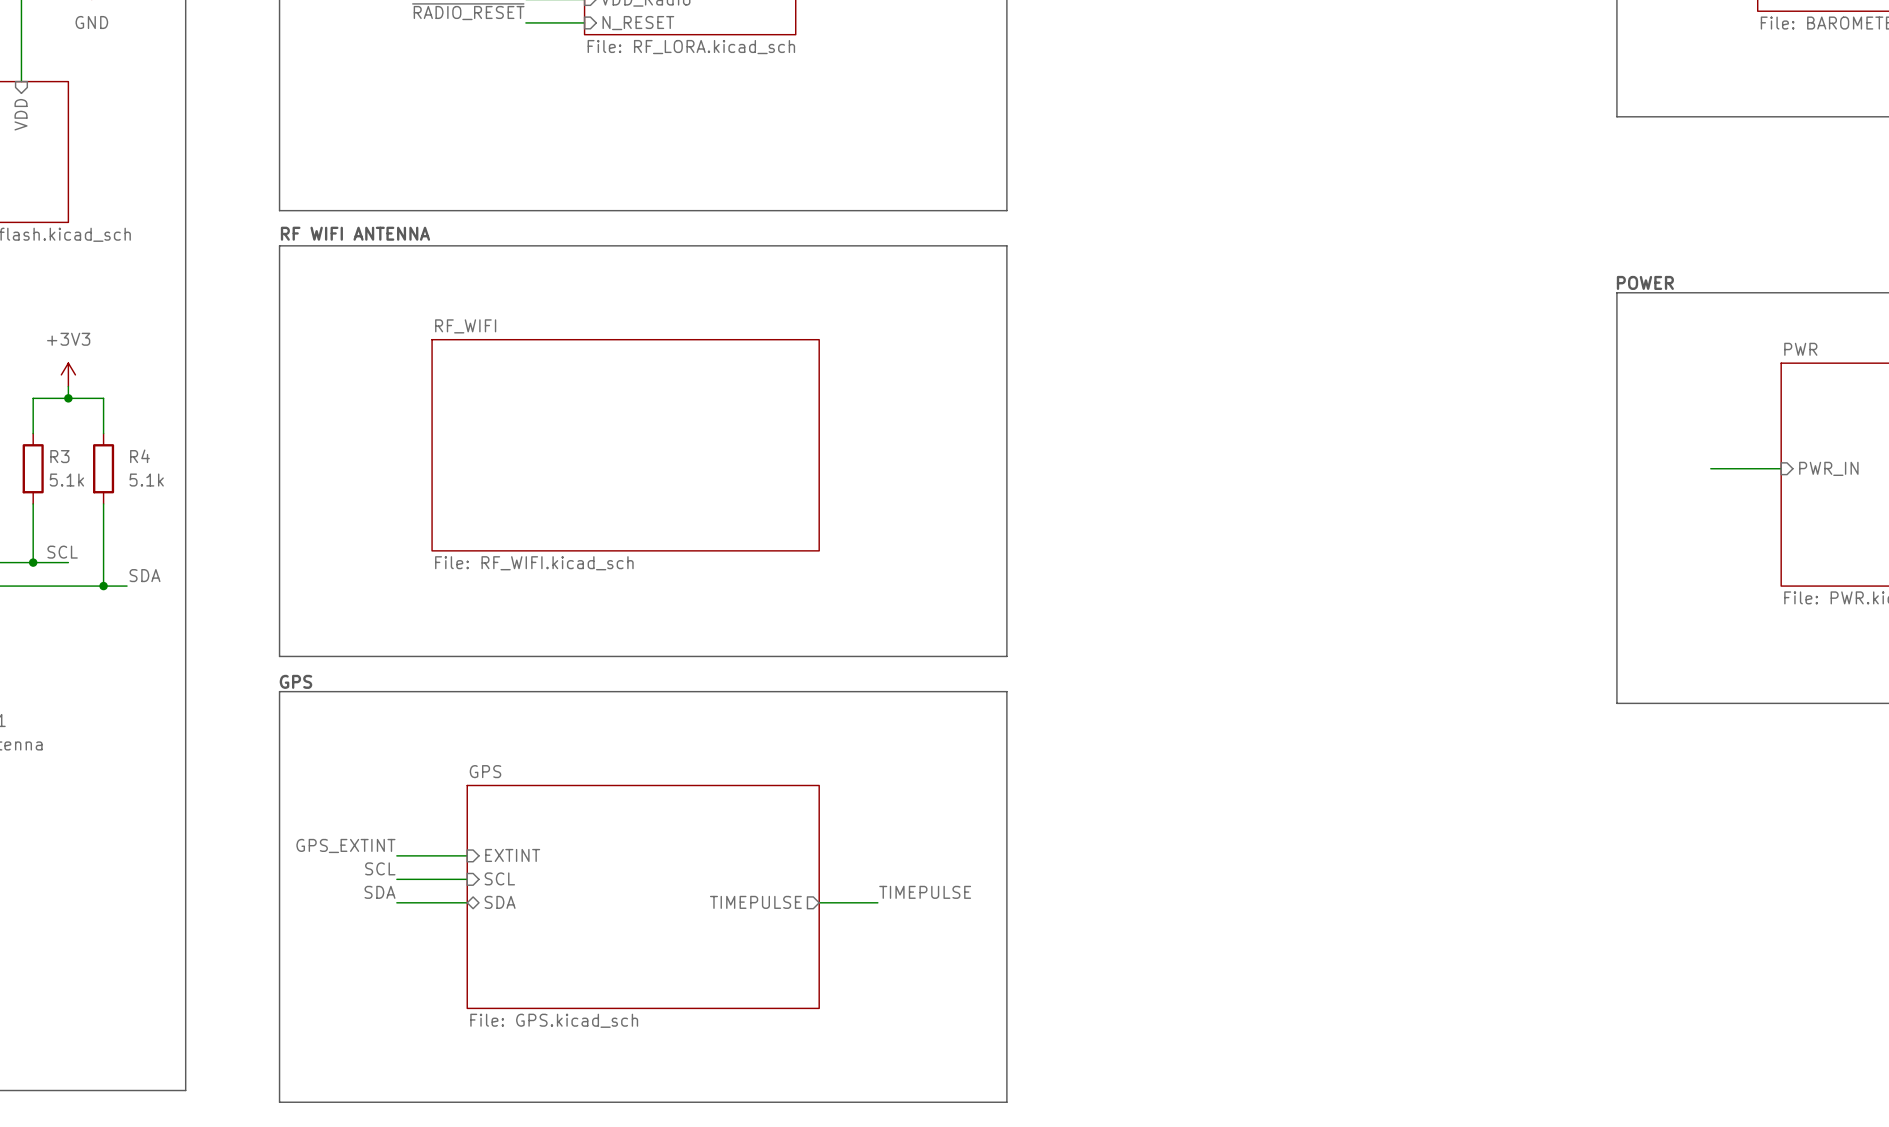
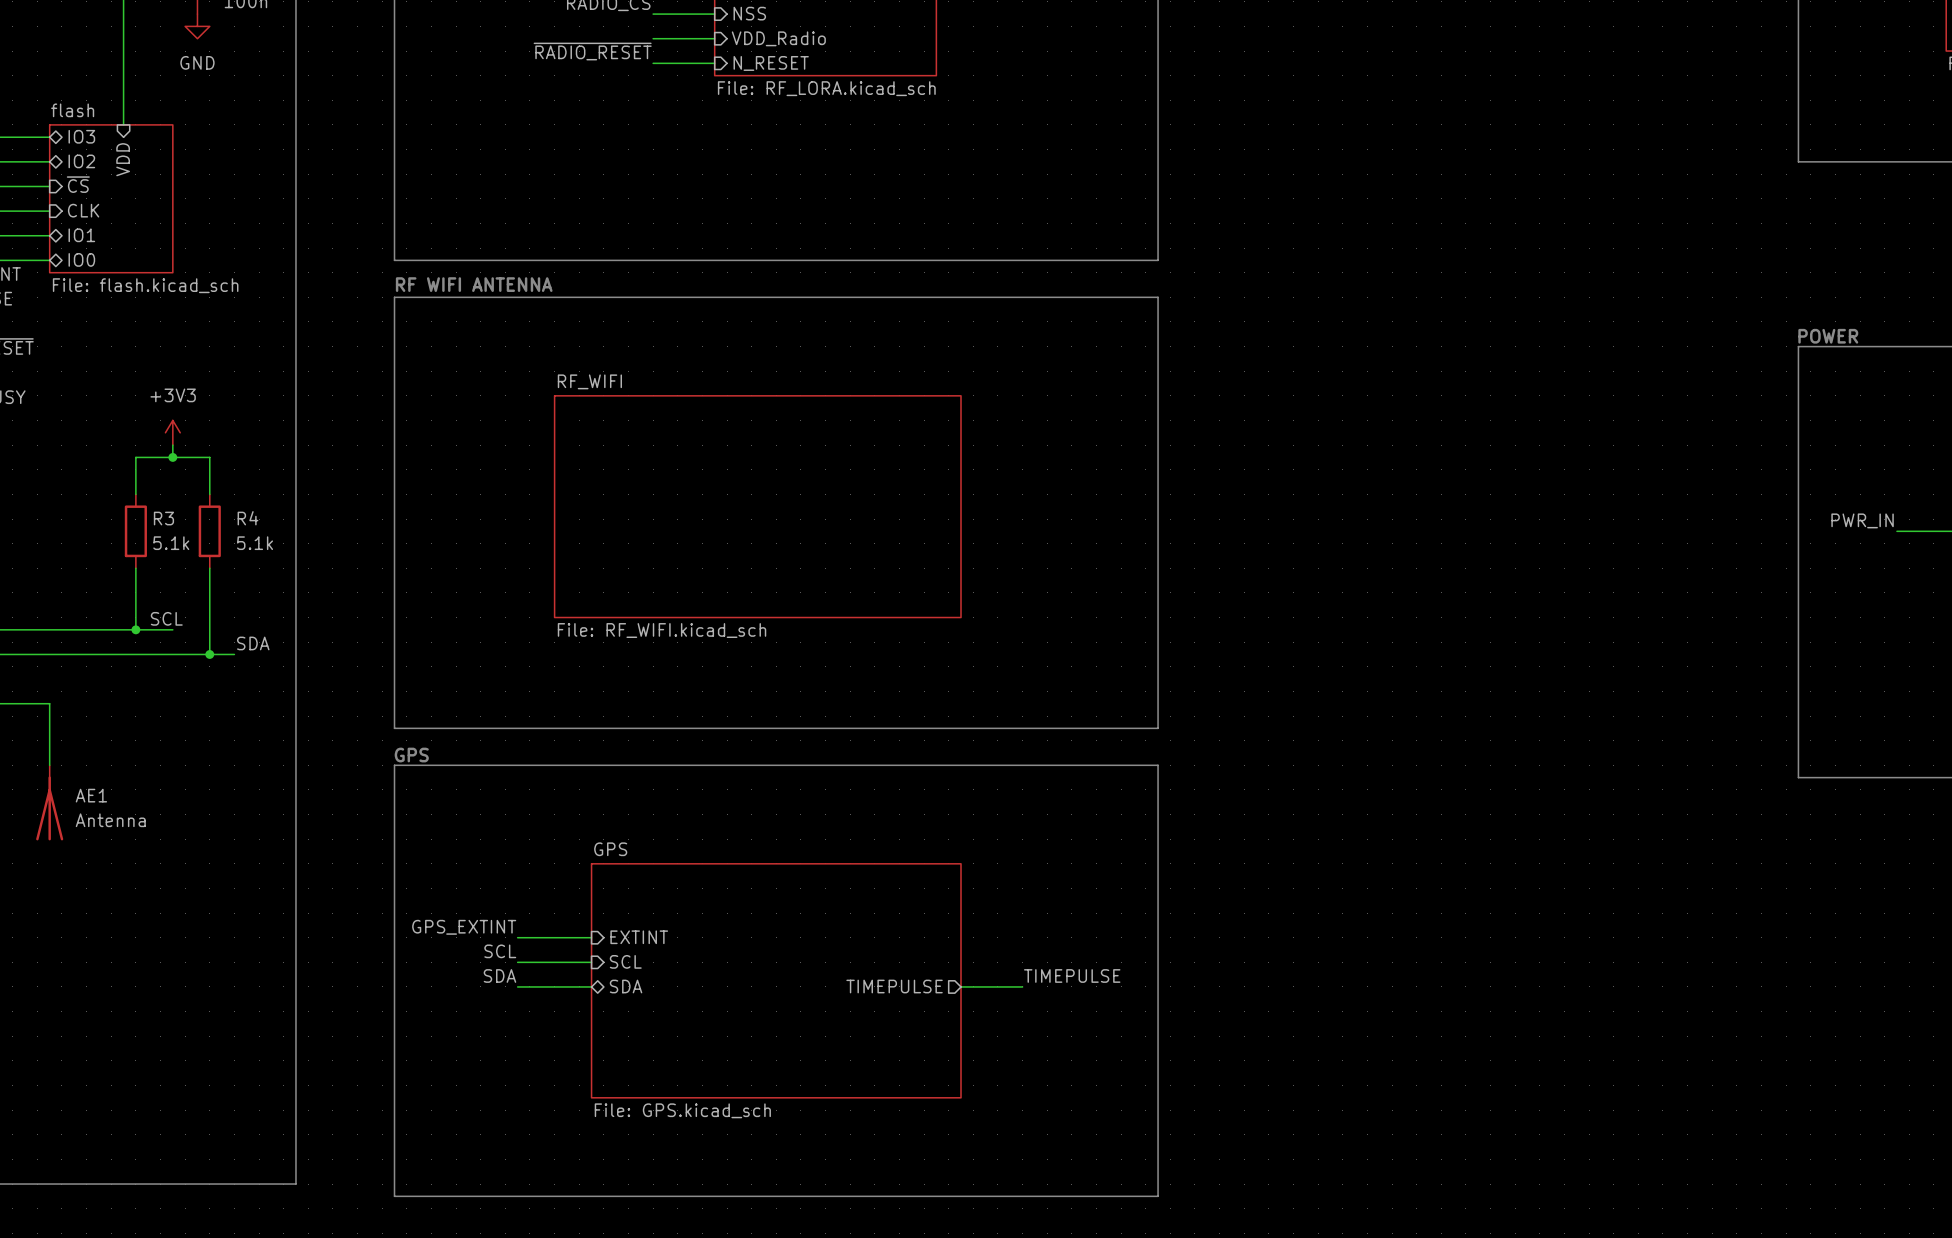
label: none -> PWR_IN (1862, 520)

